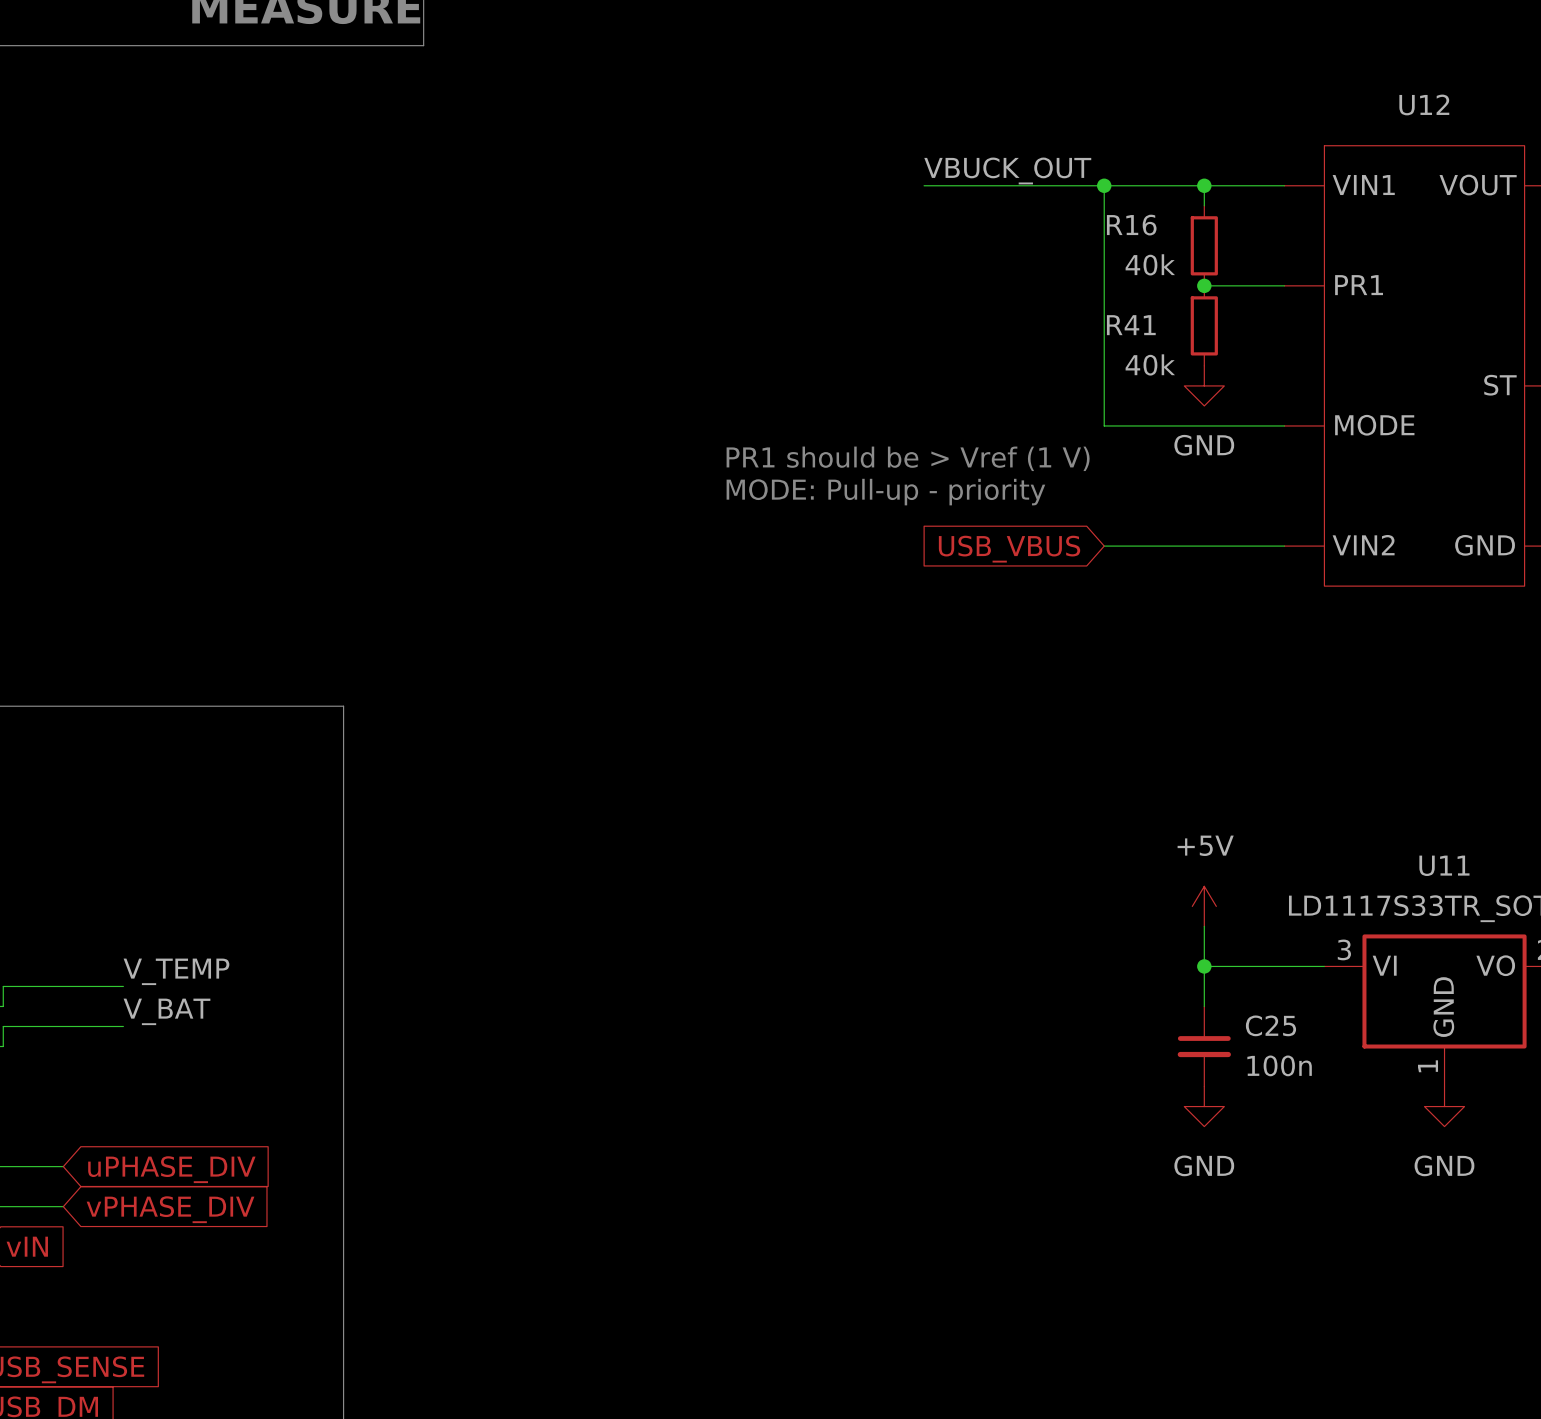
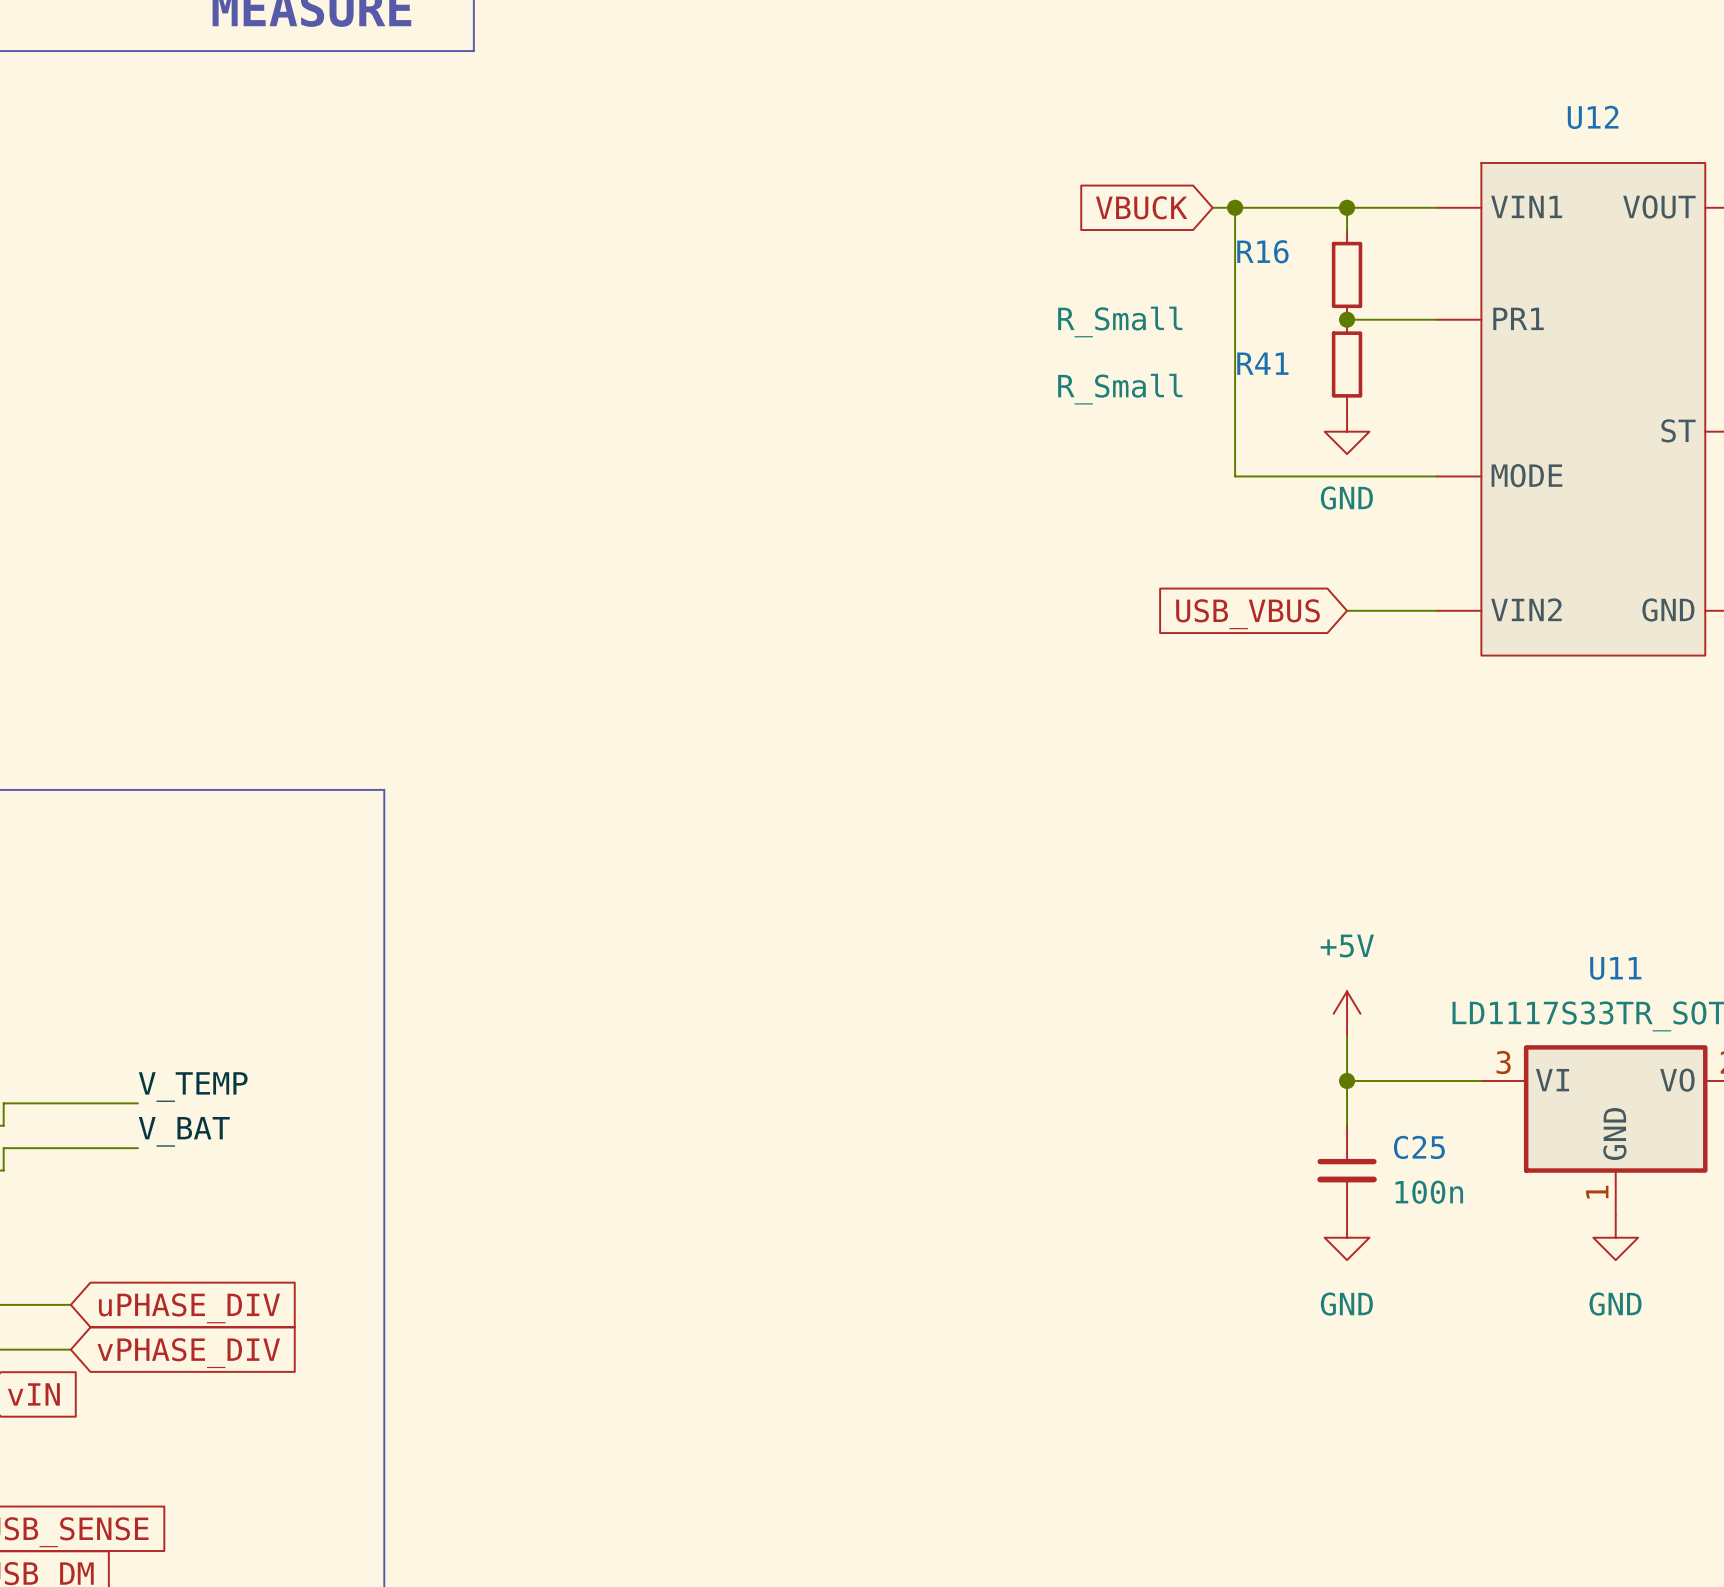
label: VBUCK_OUT (1007, 170) -> none
wire: (924, 185) (1084, 185) -> none
global label: none -> VBUCK (1141, 207)
R16 value: 40k (1150, 264) -> R_Small (1120, 321)
R41 value: 40k (1150, 364) -> R_Small (1120, 389)
text: PR1 should be > Vref (1 V) (908, 458) -> none
text: MODE: Pull-up - priority (885, 492) -> none
wire: (1104, 546) (1204, 546) -> none
global label position: USB_VBUS (1009, 549) -> USB_VBUS (1247, 614)

